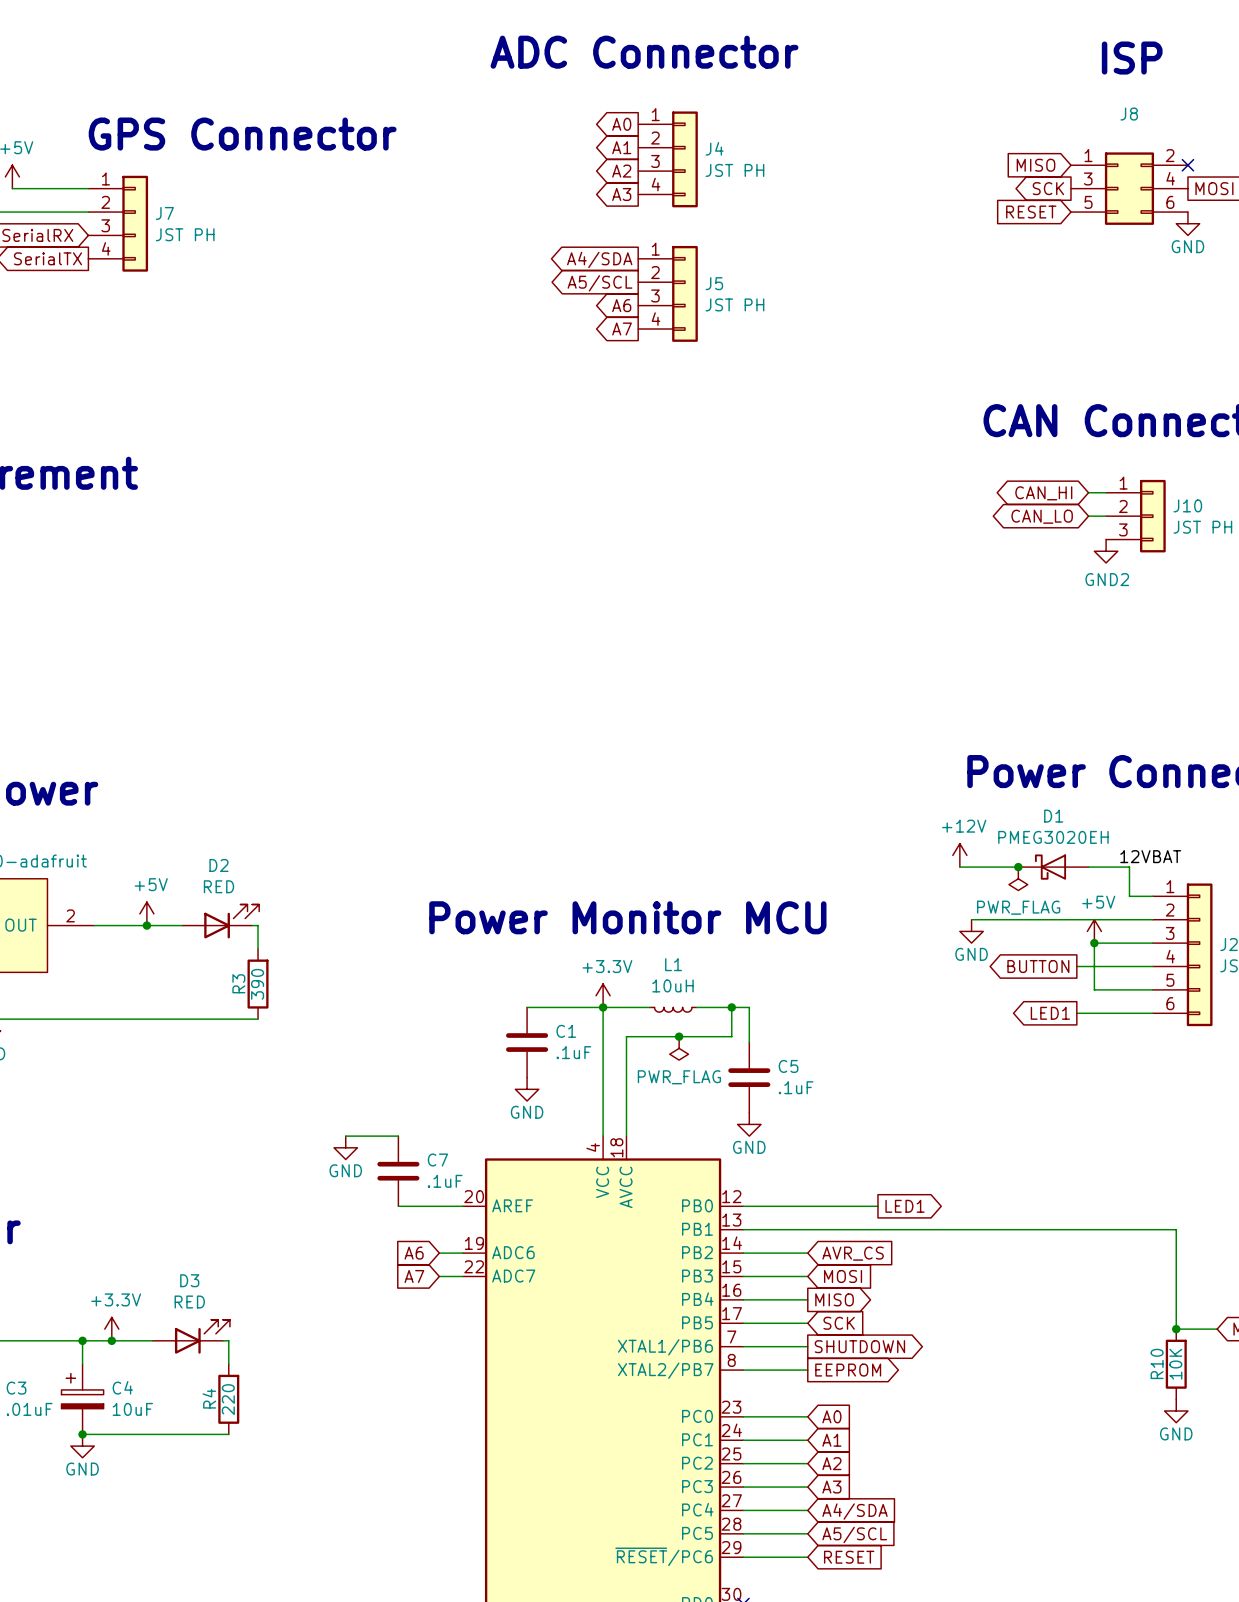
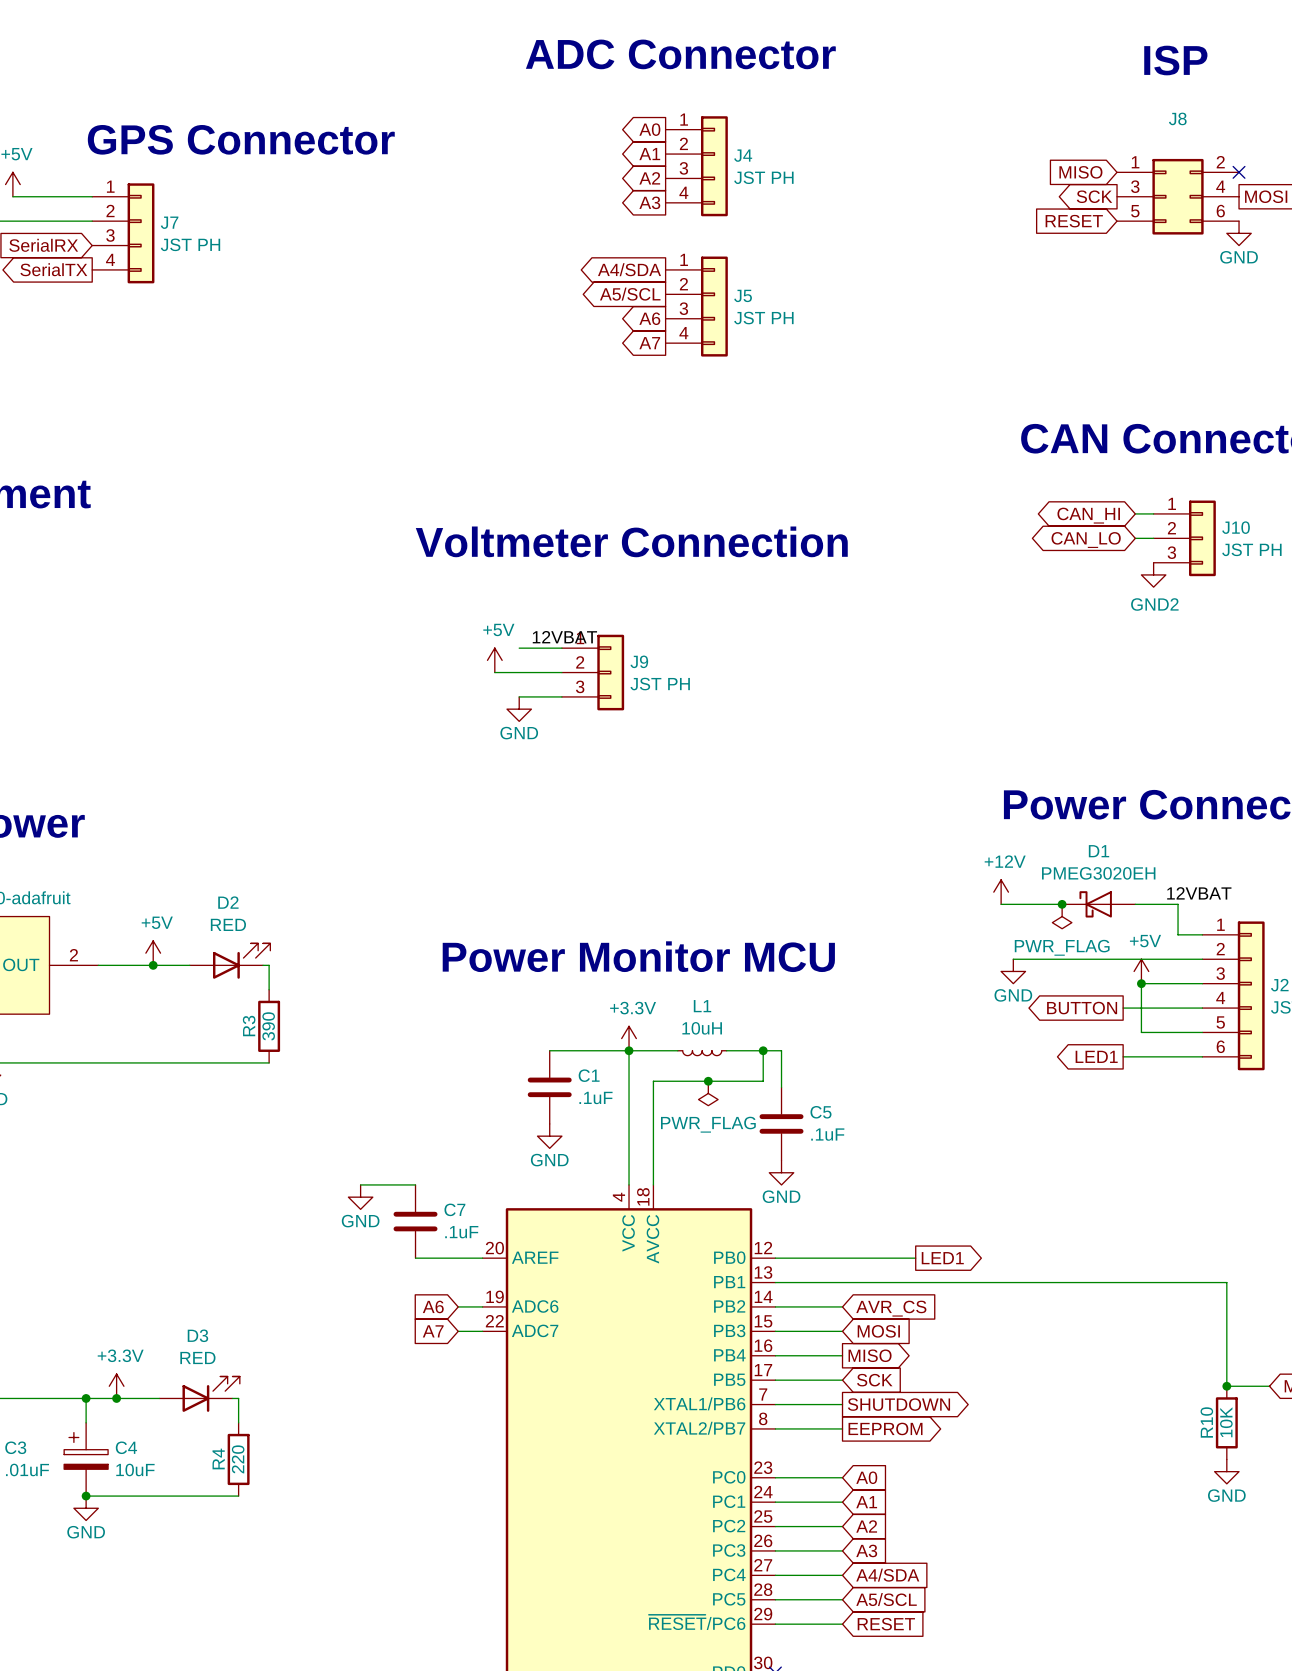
text: none -> Voltmeter Connection (631, 541)
label: none -> 12VBAT (564, 637)
wire: none -> (519, 648) (561, 648)
power symbol: none -> +5V (494, 660)
wire: none -> (494, 672) (561, 672)
J9: none -> JST PH (593, 672)
wire: none -> (519, 696) (561, 696)
power symbol: none -> GND (519, 709)

